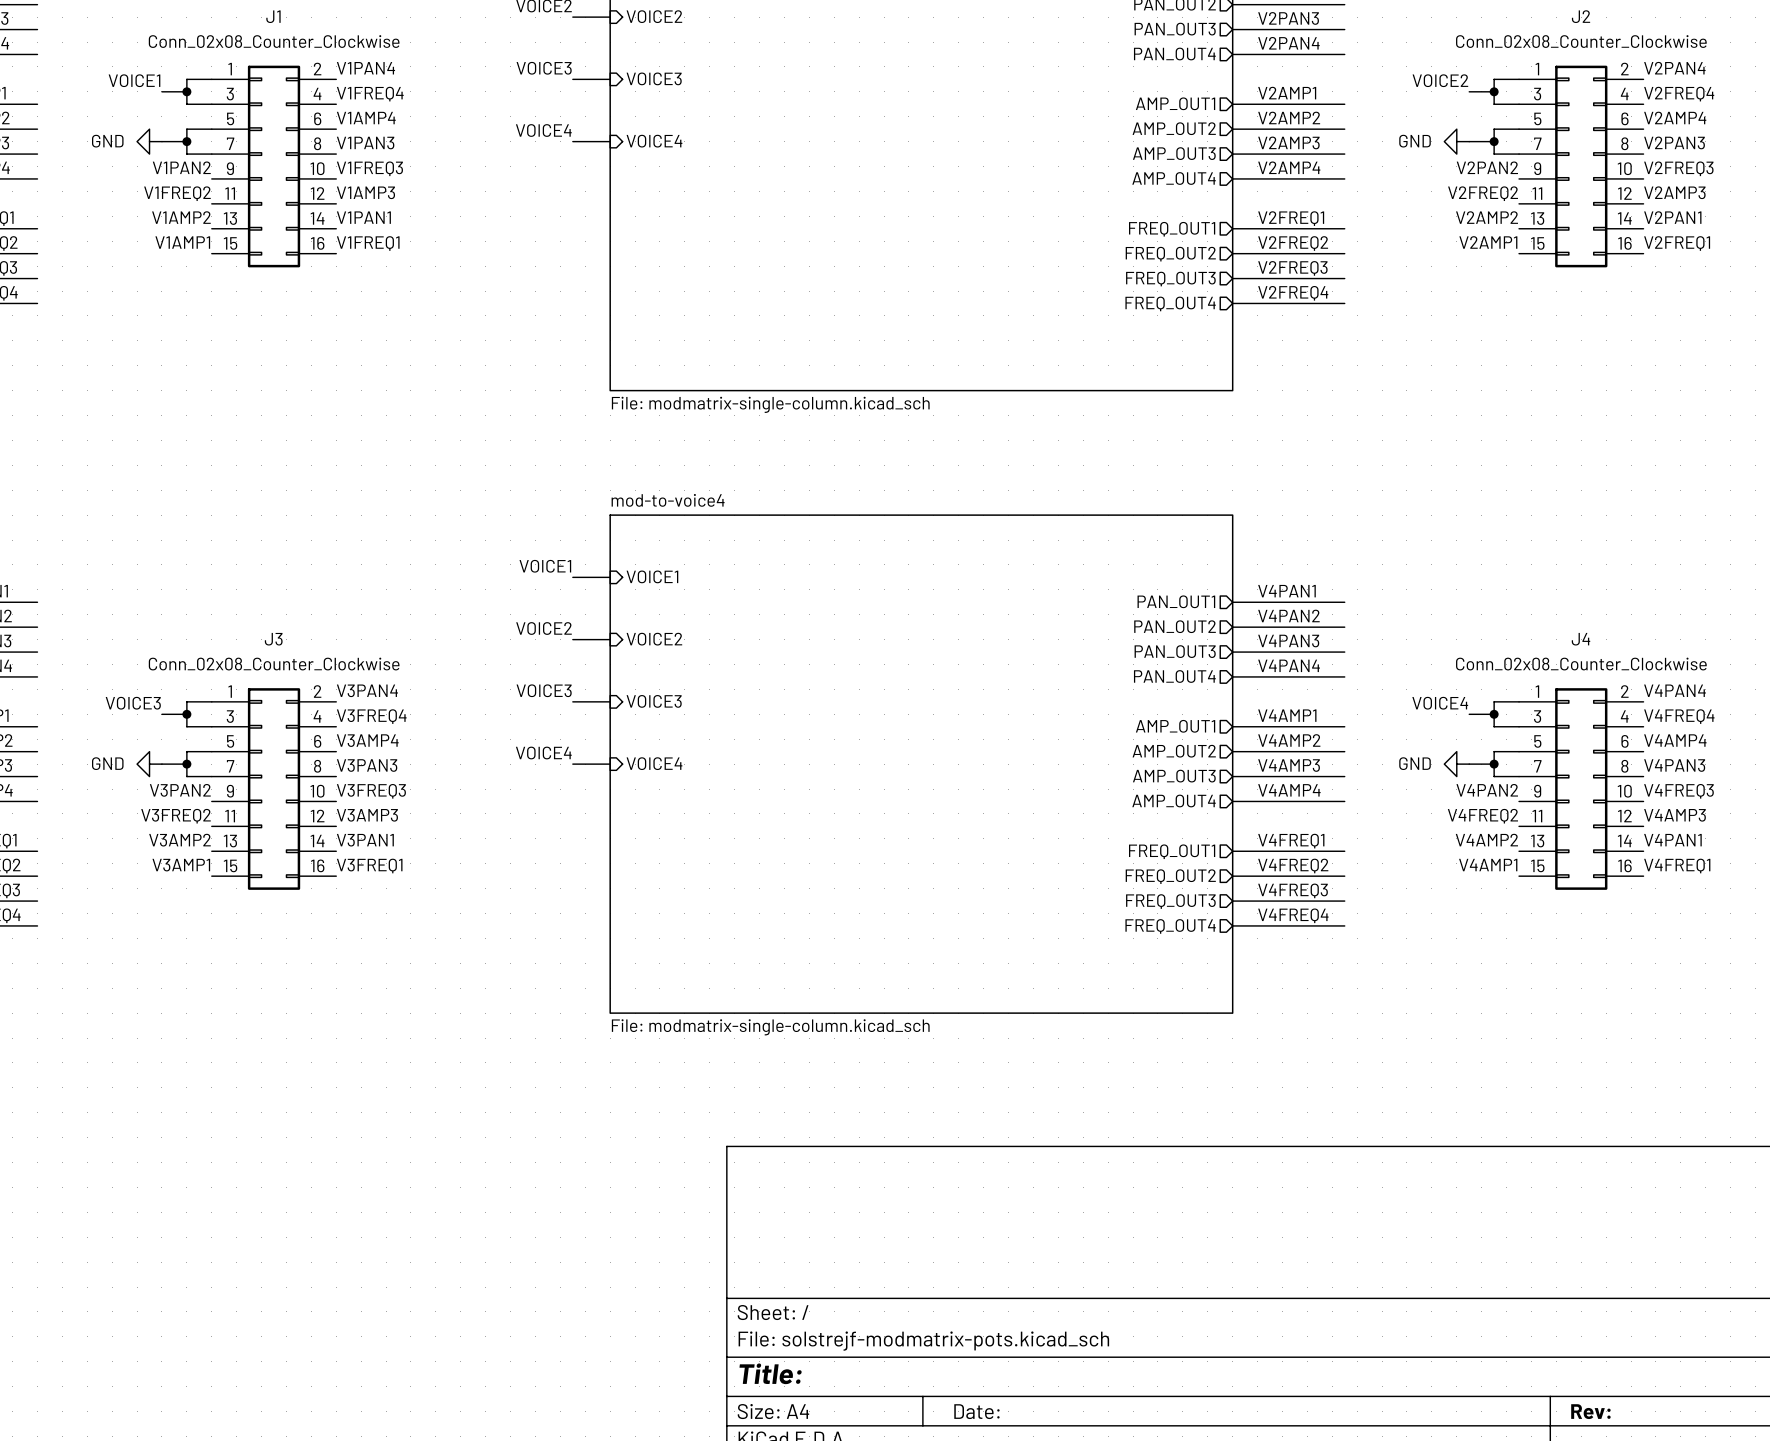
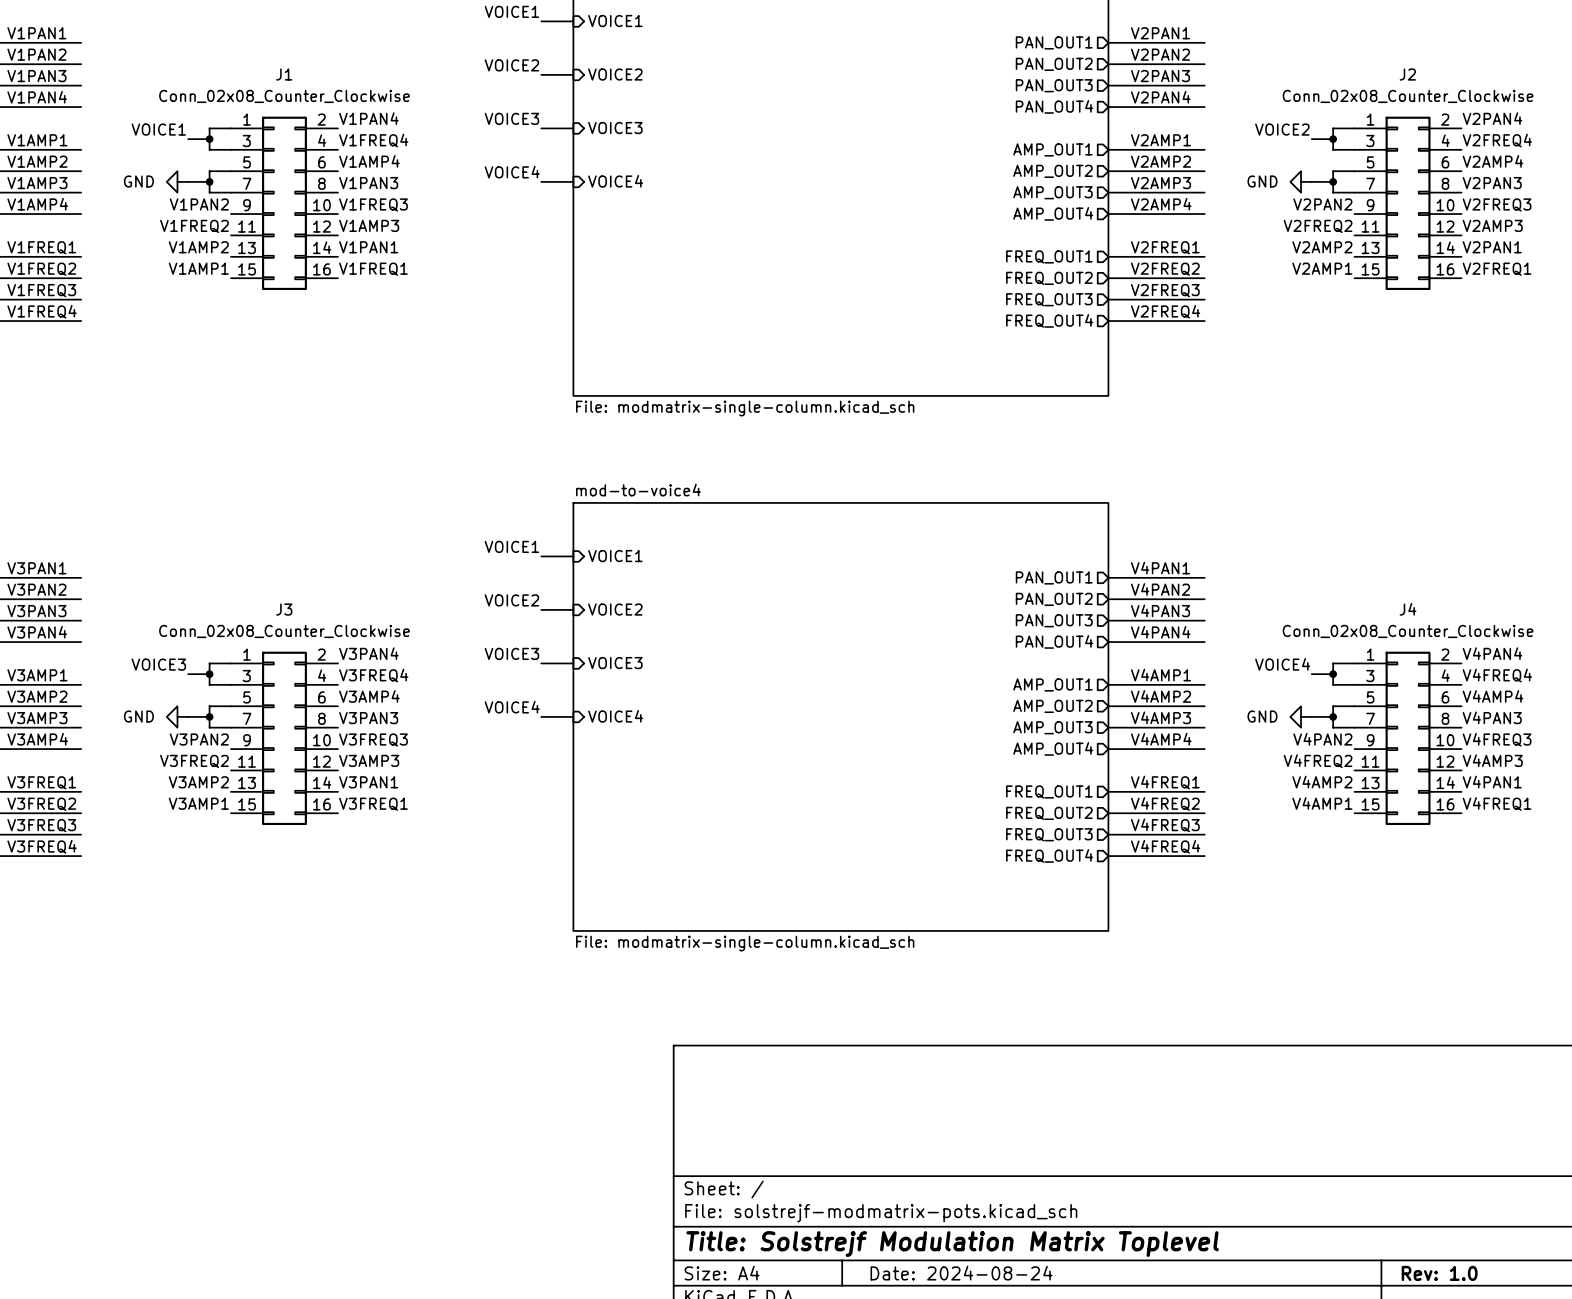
title block: Title: (770, 1373) -> Title: Solstrejf Modulation Matrix Toplevel (952, 1244)
title block: Date: (976, 1411) -> Date: 2024-08-24 (961, 1273)
title block: Rev: (1590, 1411) -> Rev: 1.0 (1439, 1273)

